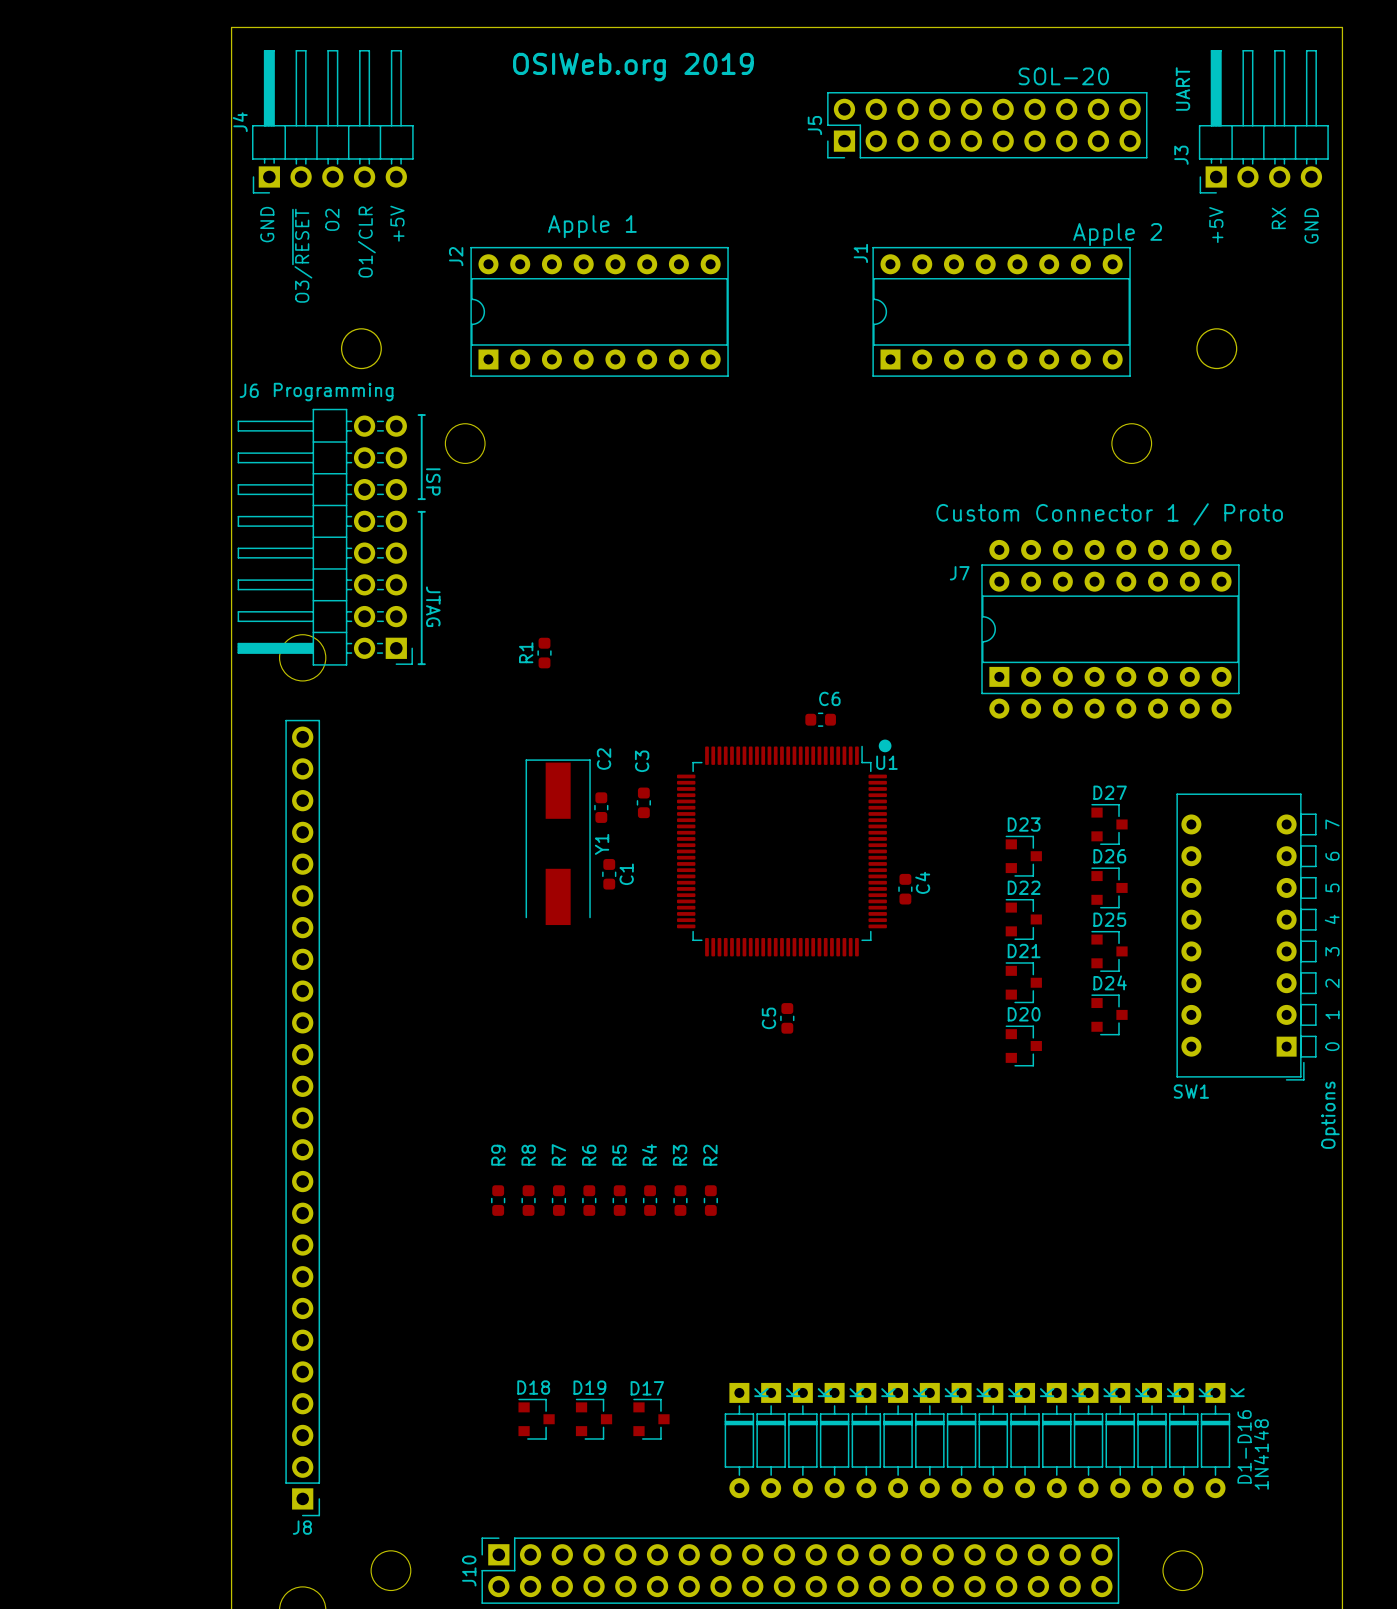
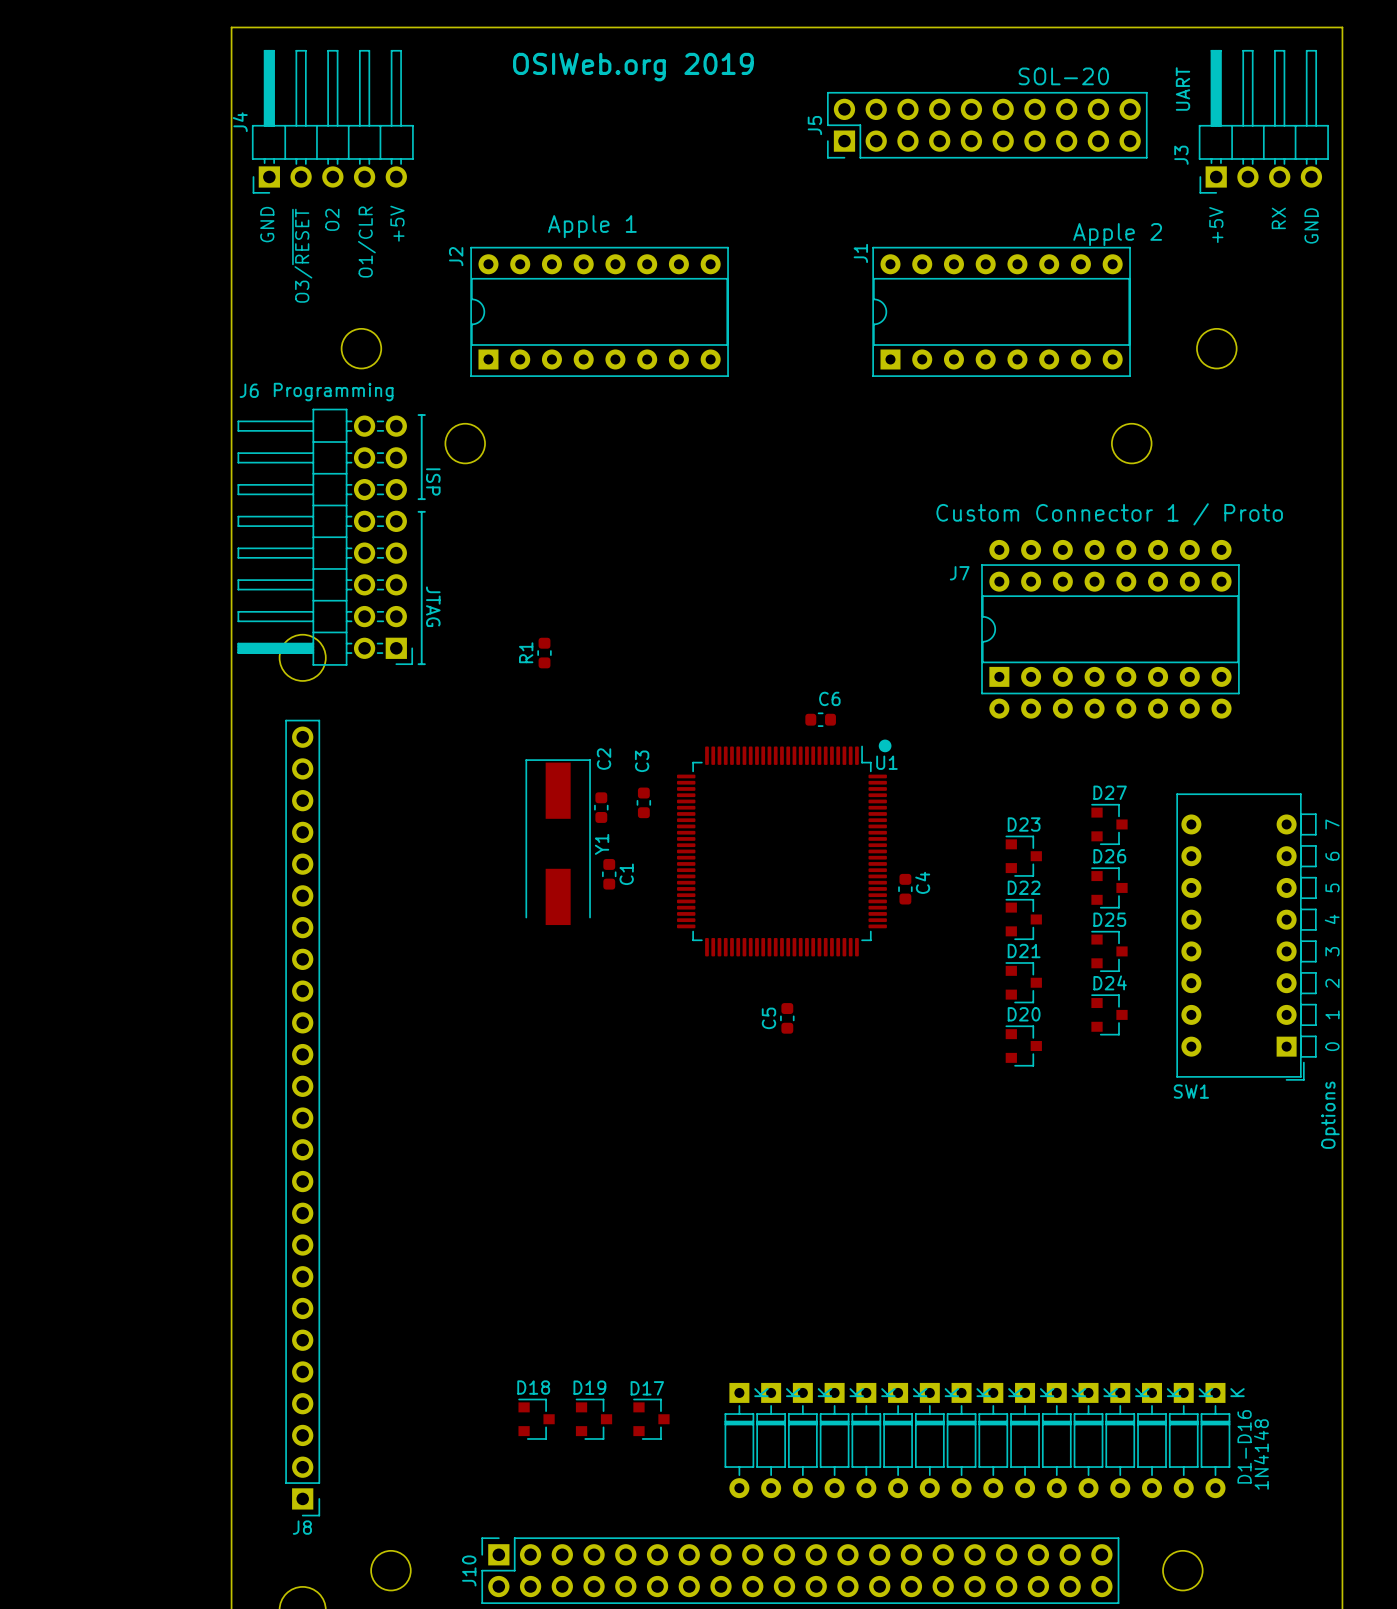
R9: (498, 1200) -> none
R8: (528, 1200) -> none
R7: (558, 1200) -> none
R6: (589, 1200) -> none
R5: (619, 1200) -> none
R4: (650, 1200) -> none
R3: (680, 1200) -> none
R2: (710, 1200) -> none

